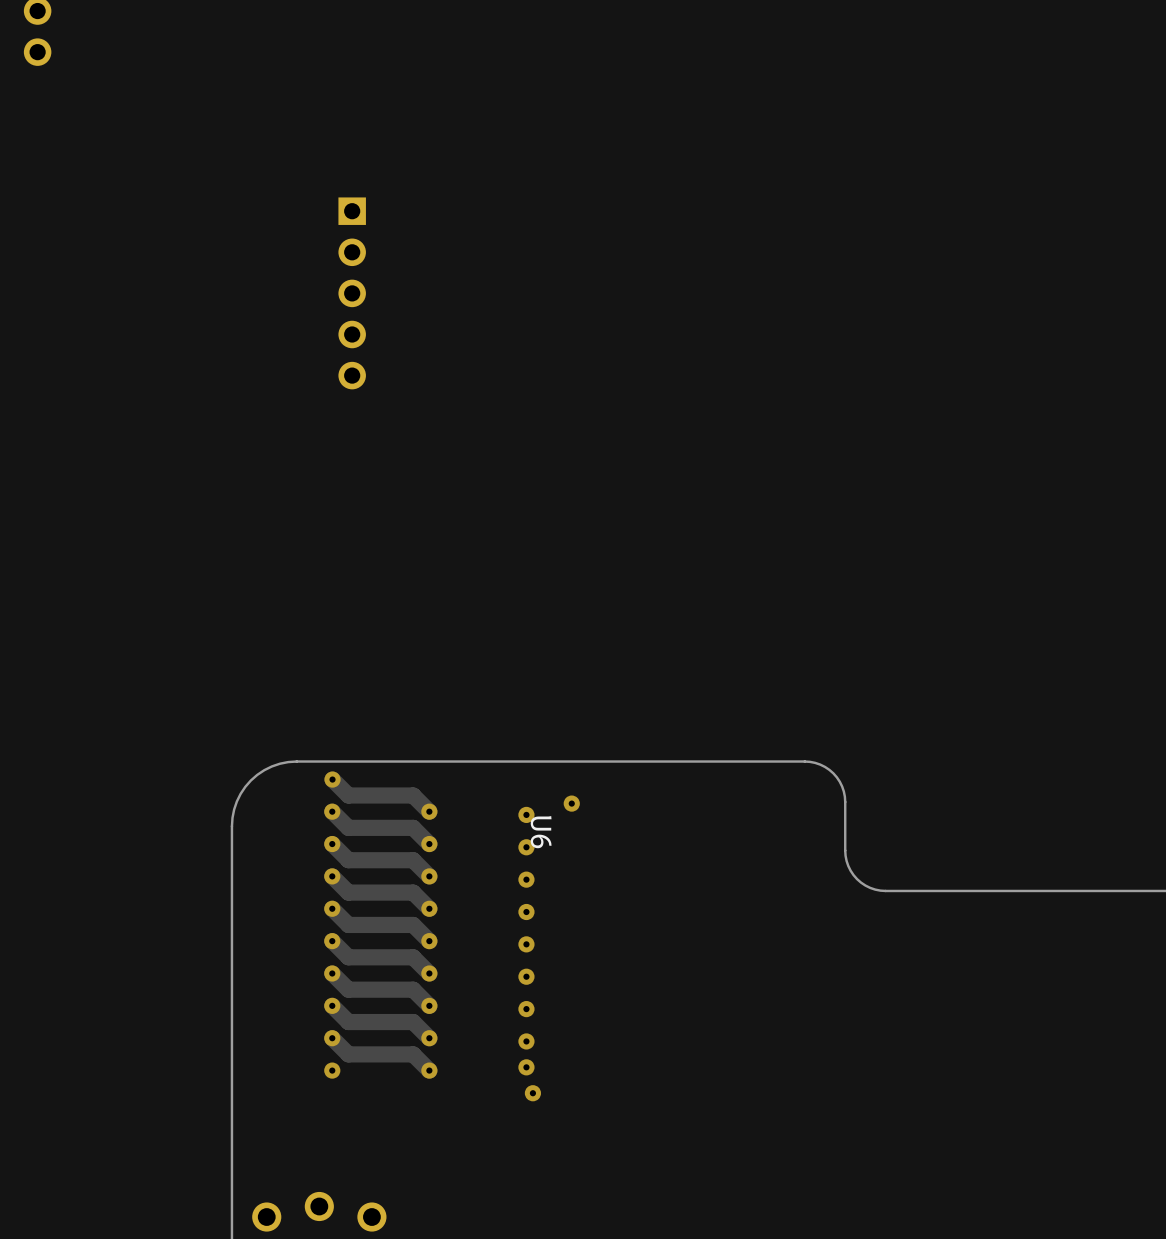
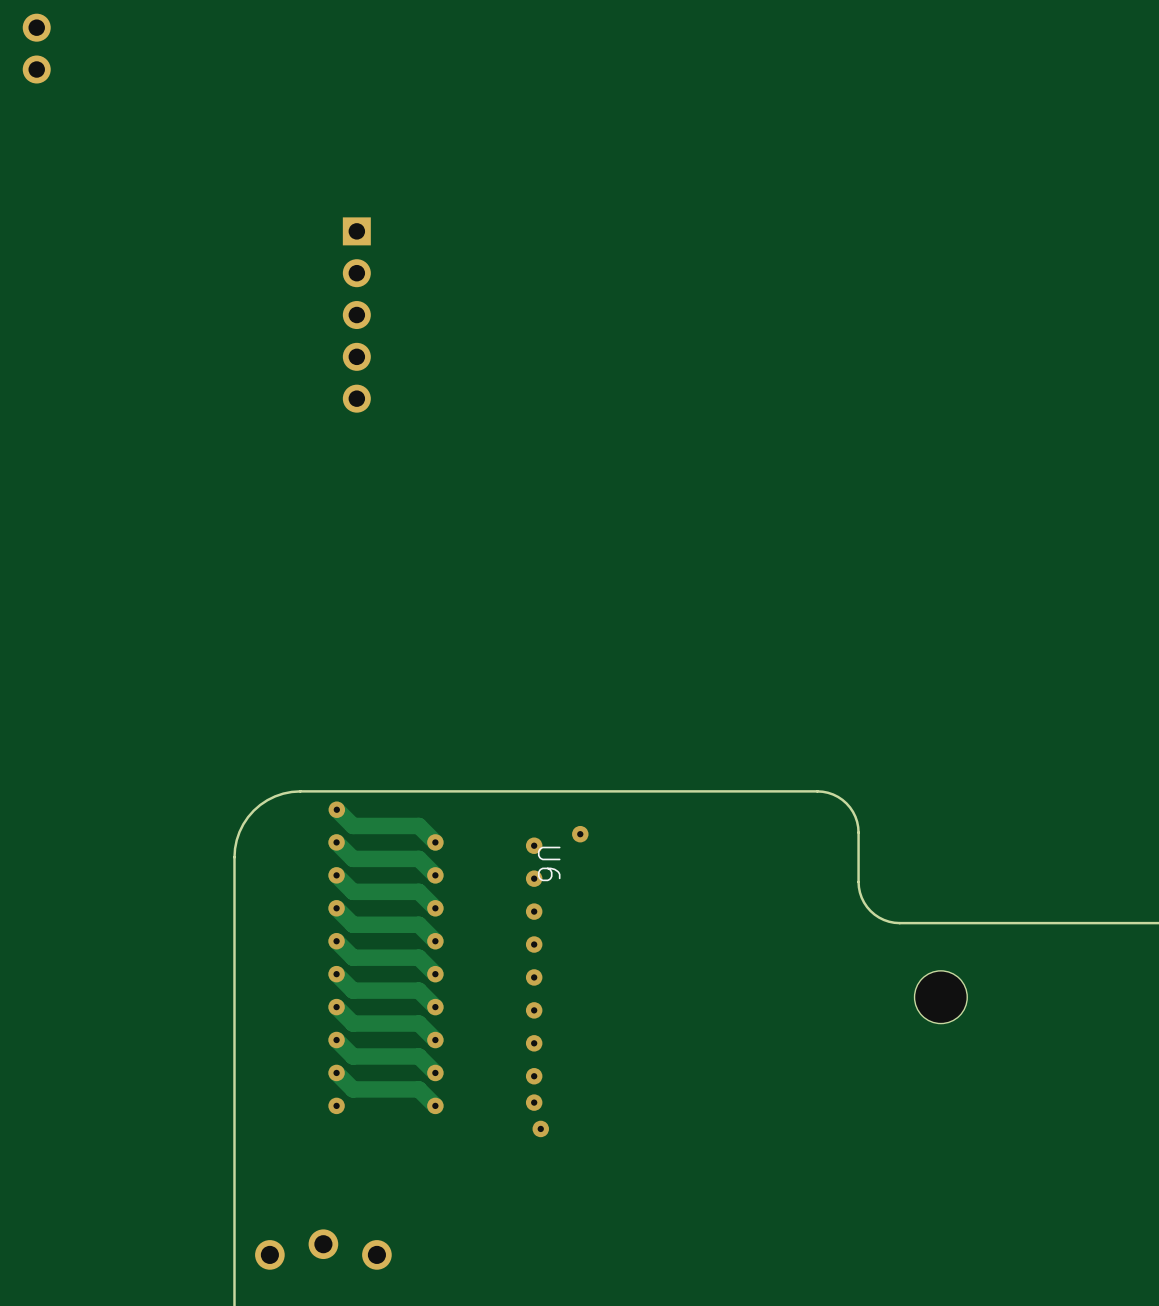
part: none -> (940, 997)

